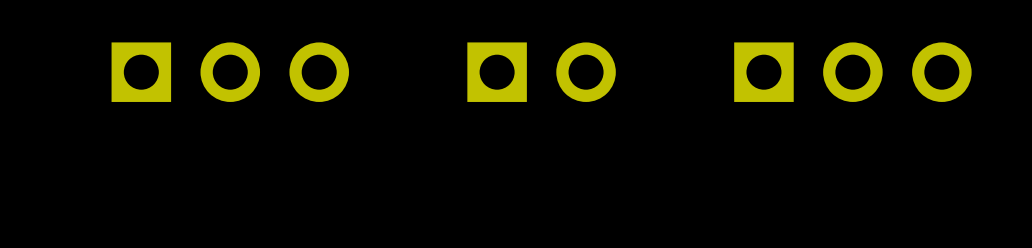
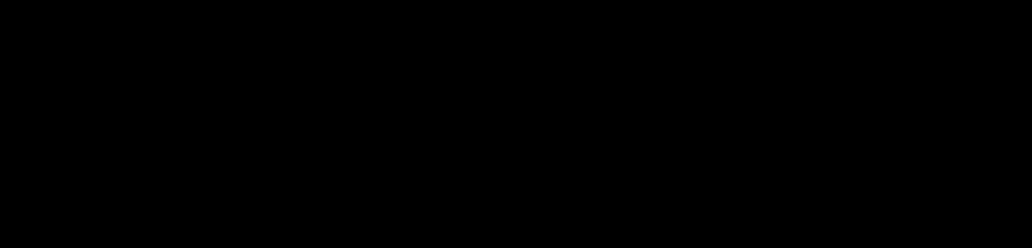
part: (230, 72) -> none
part: (541, 72) -> none
part: (852, 72) -> none

